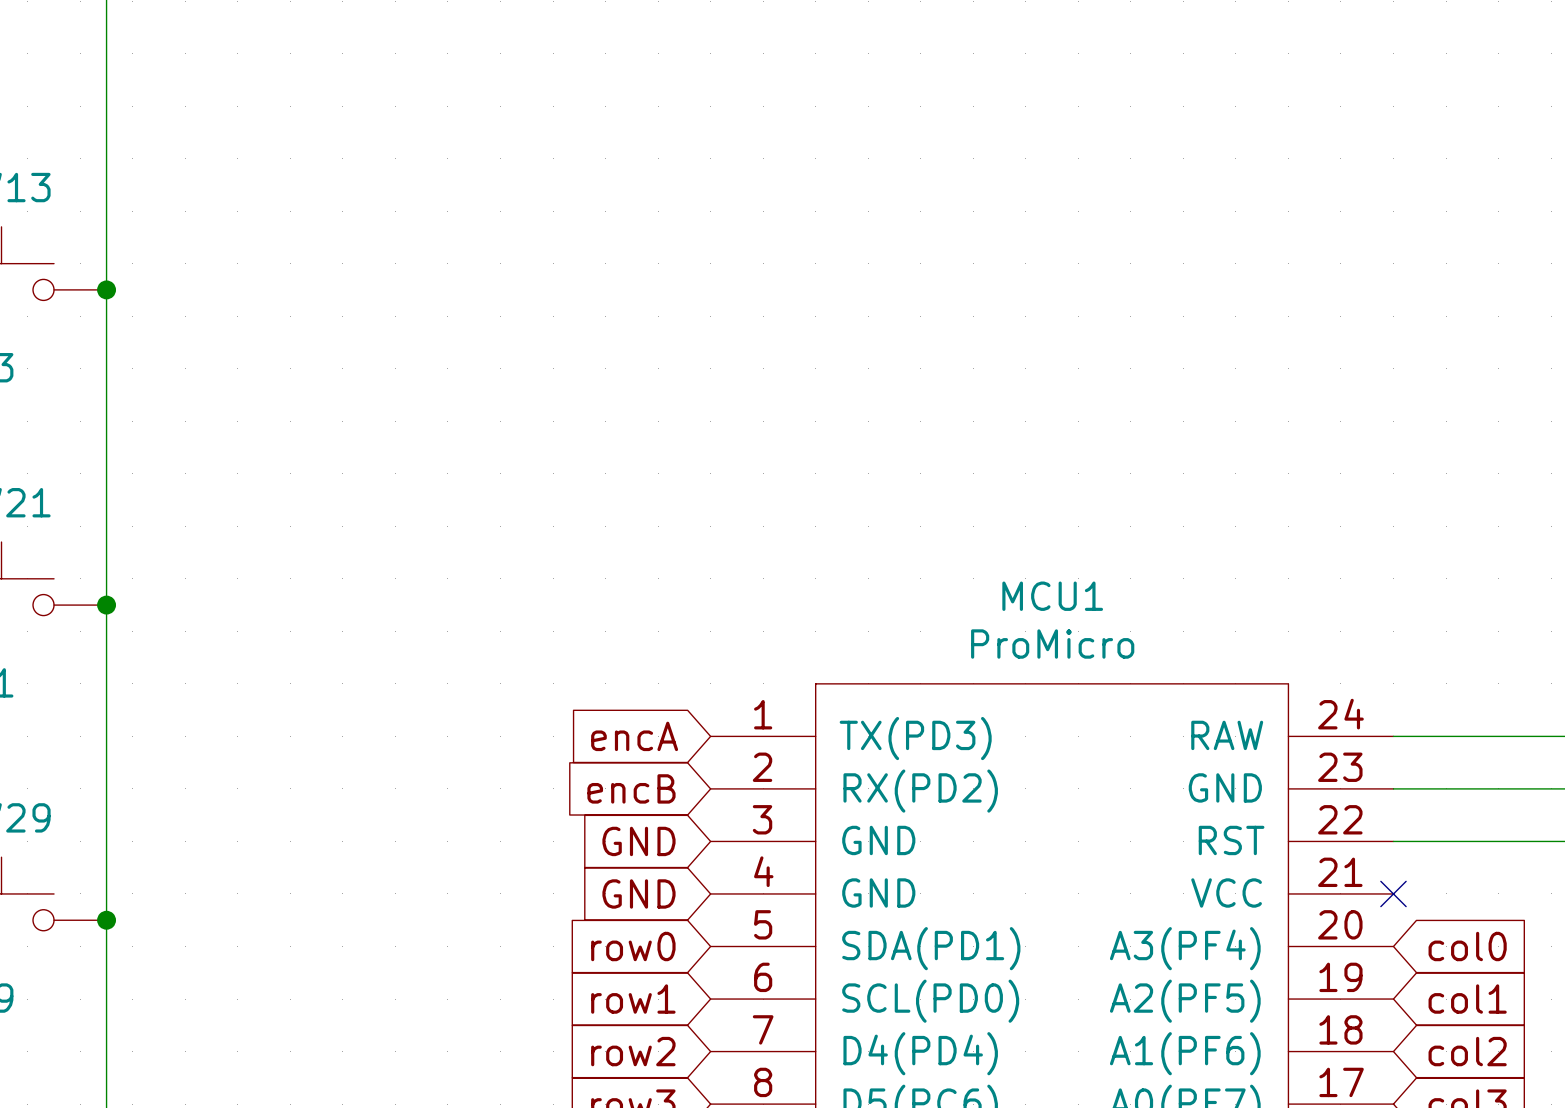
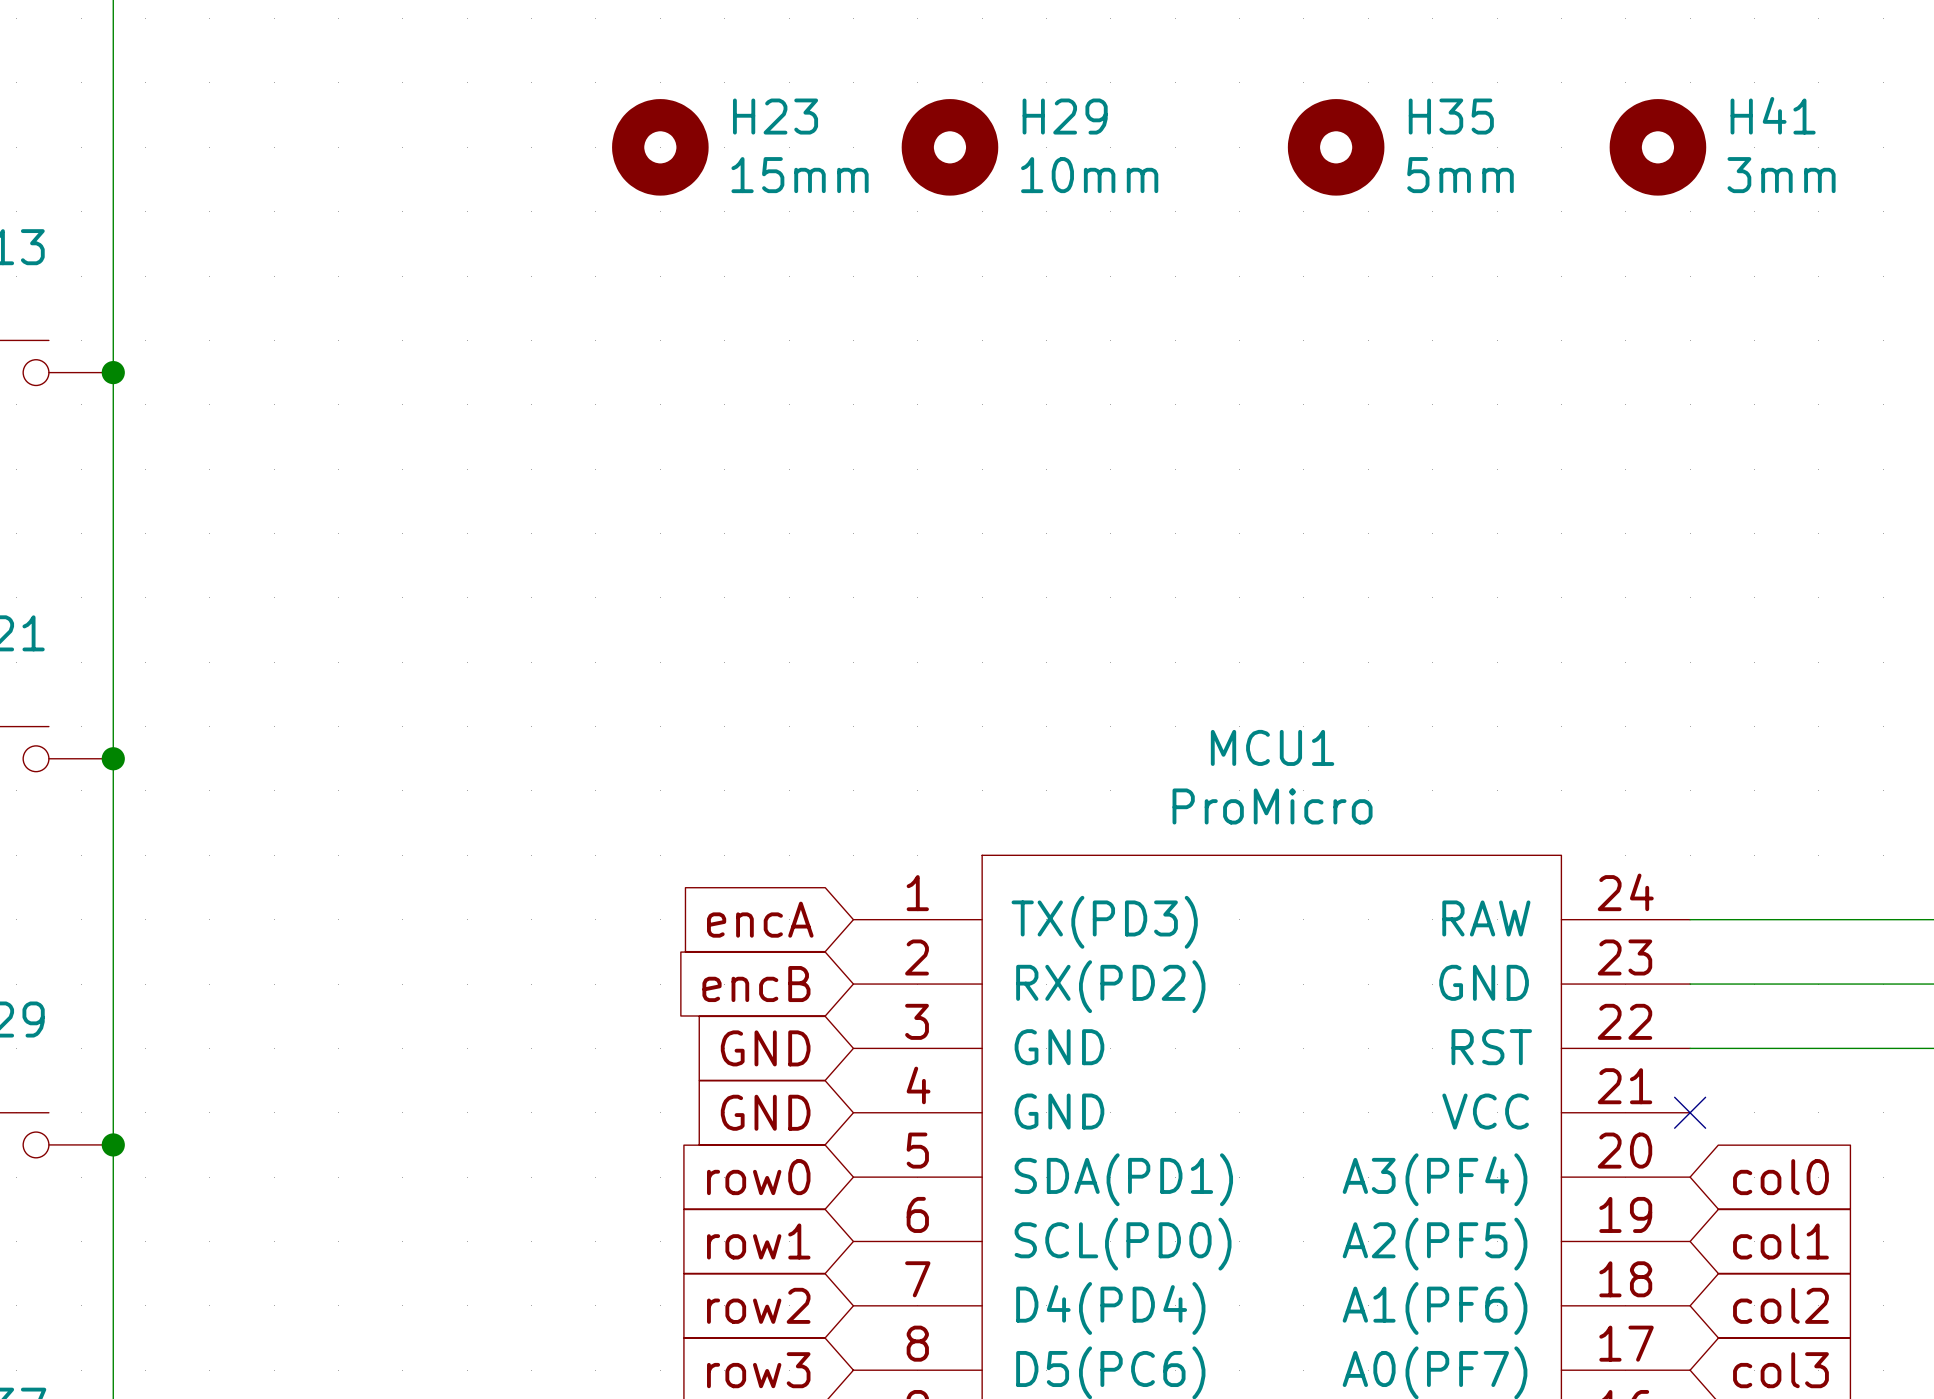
H23: none -> 15mm (660, 147)
H29: none -> 10mm (949, 147)
H35: none -> 5mm (1336, 147)
H41: none -> 3mm (1657, 147)

